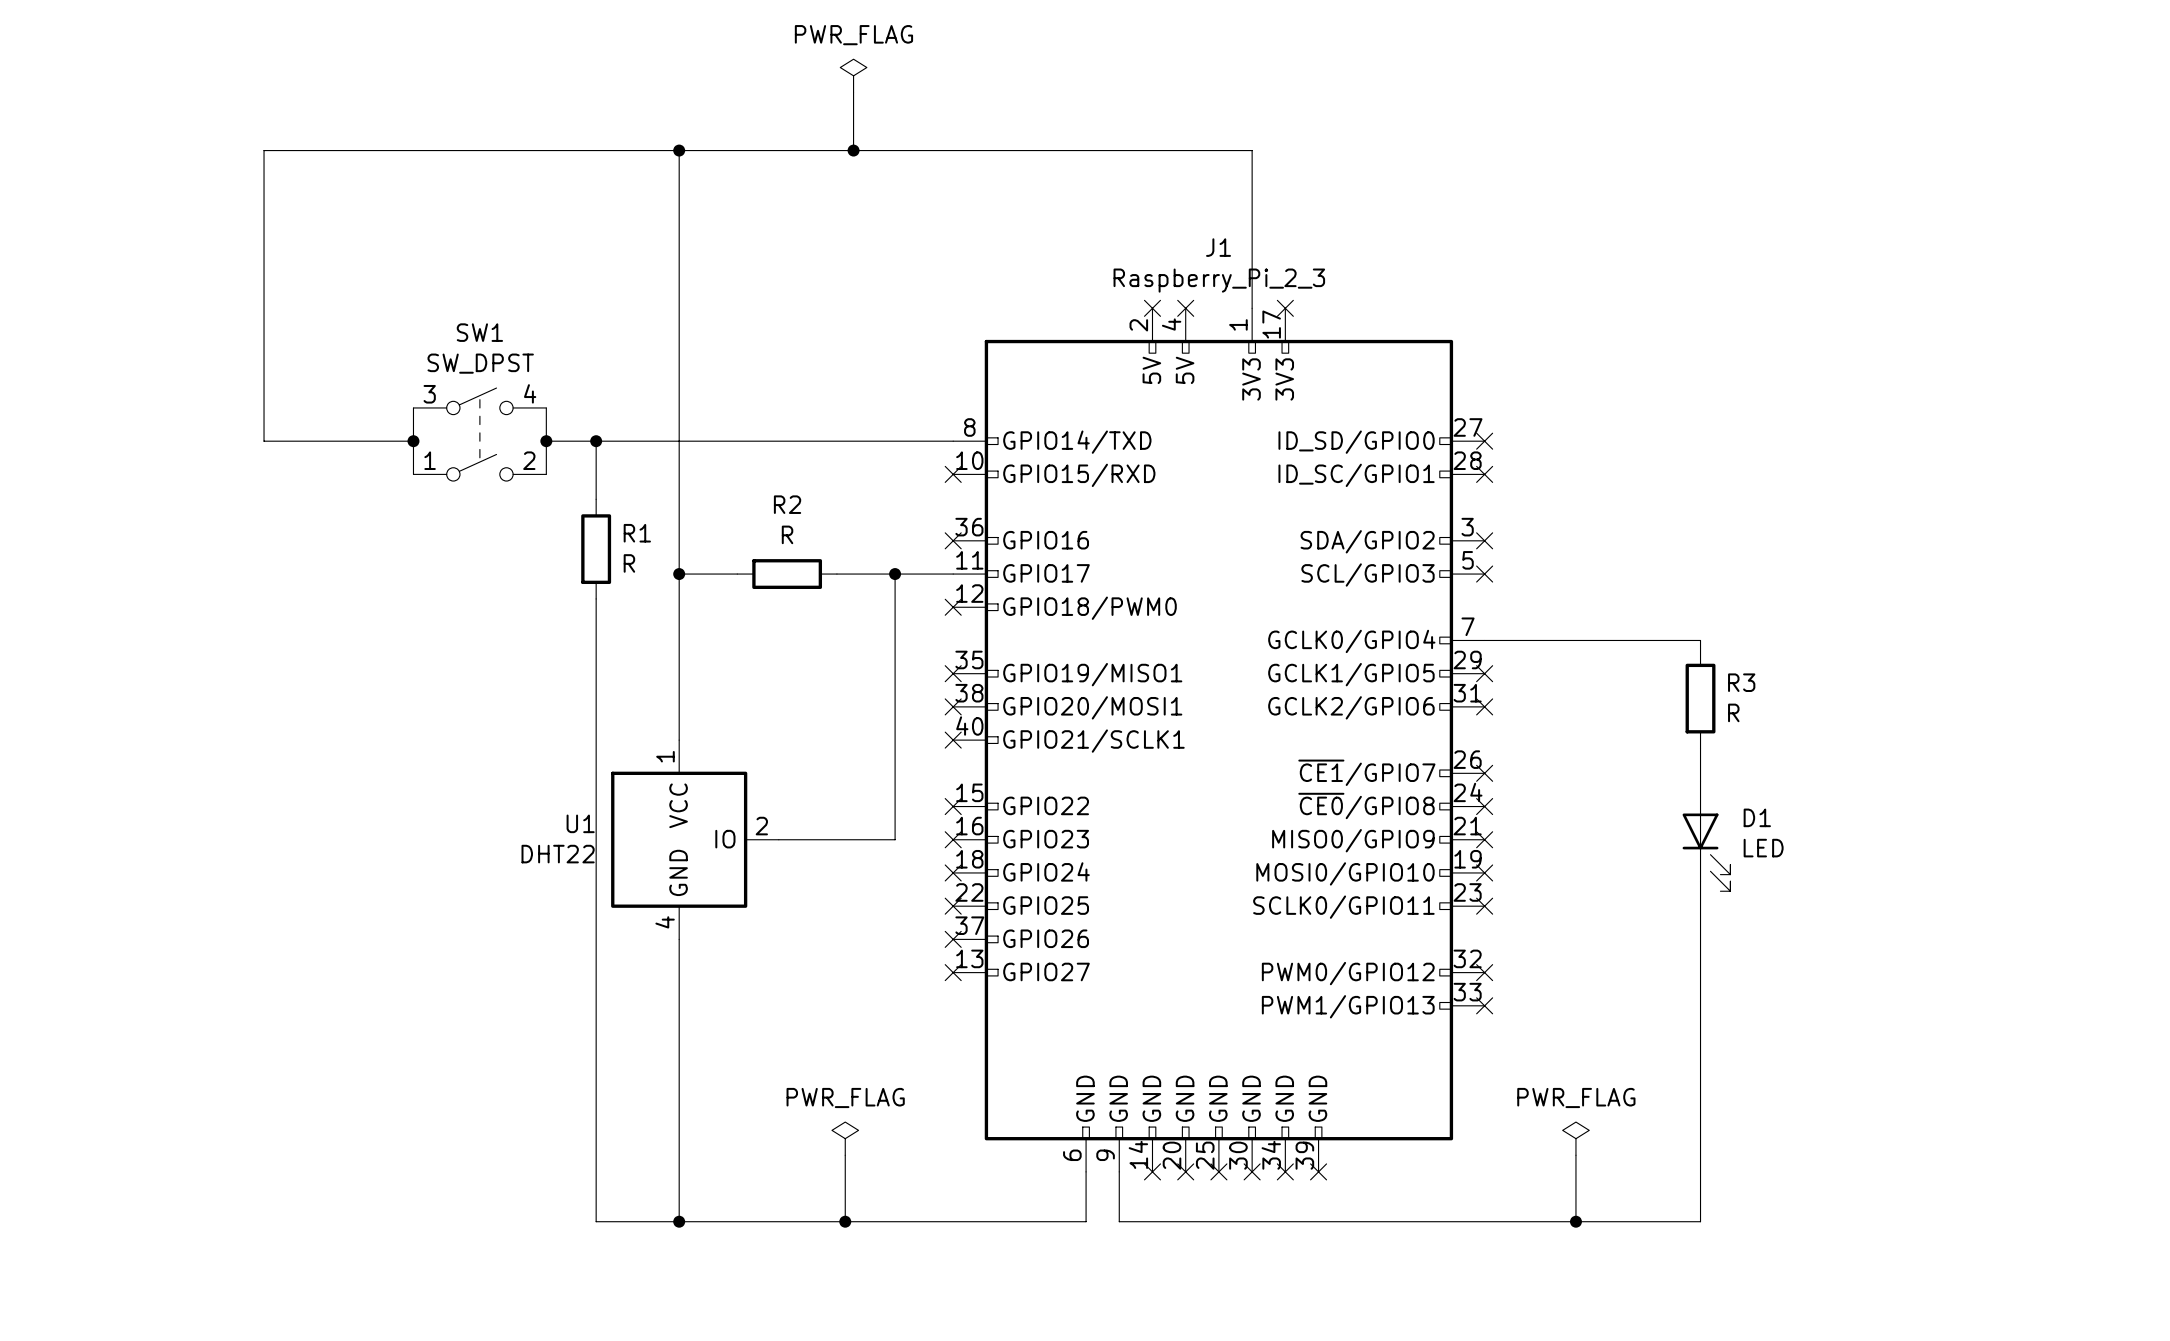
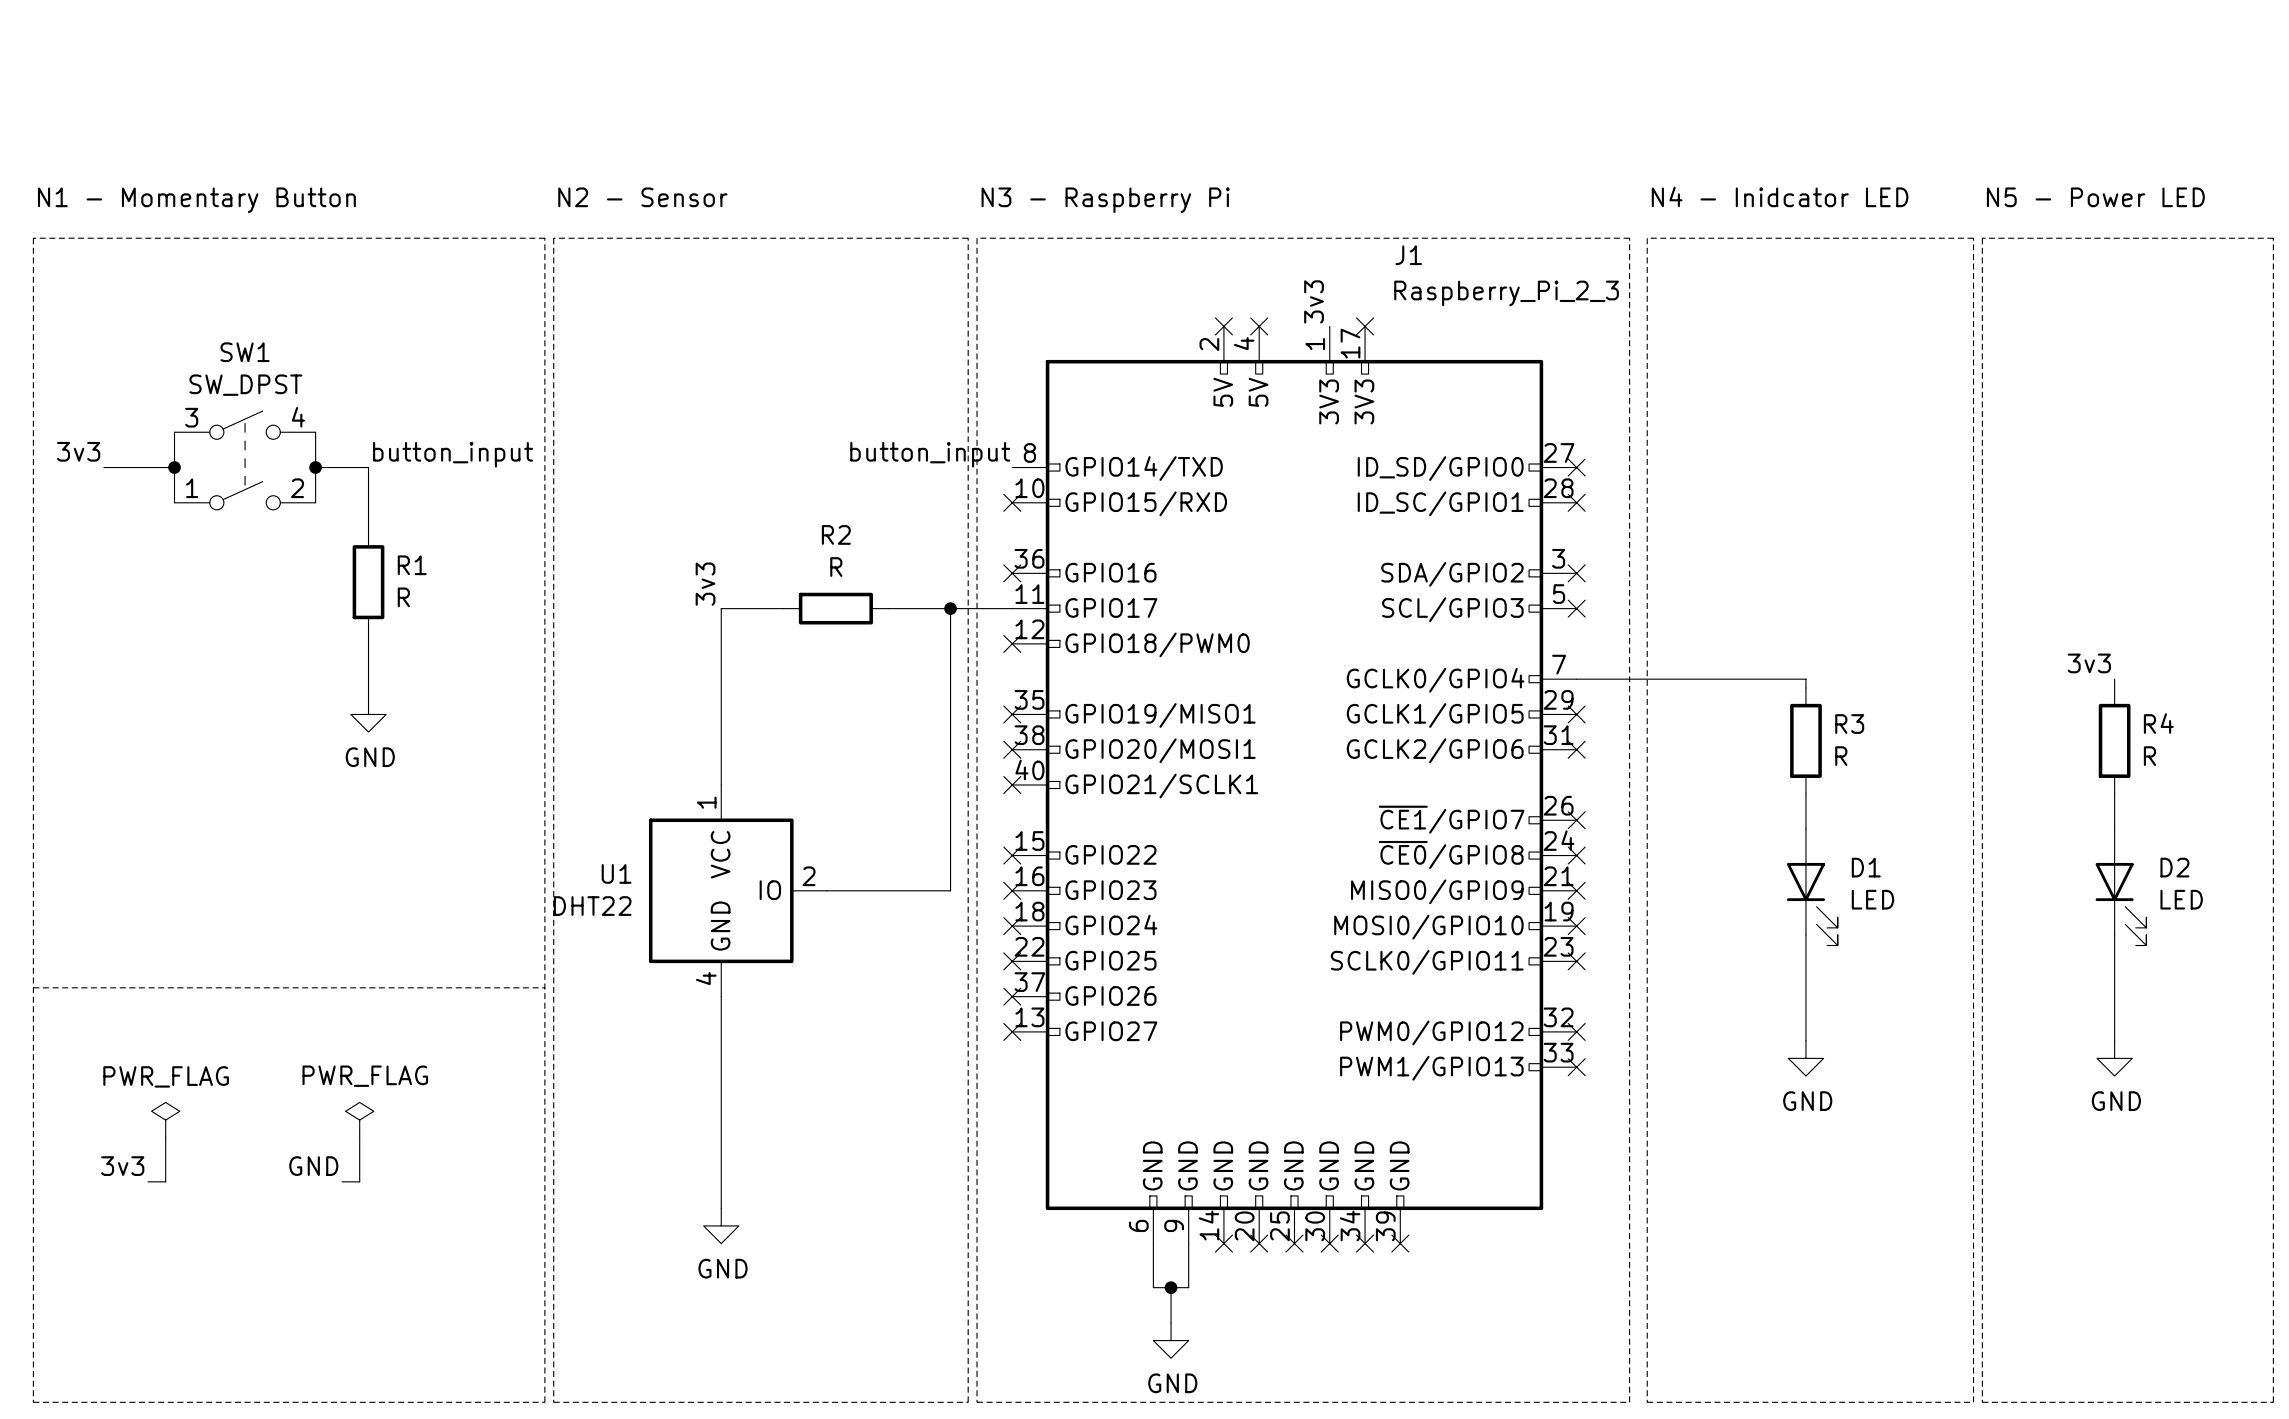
power symbol: PWR_FLAG (853, 75) -> none
wire: (853, 92) (853, 150) -> none
wire: (679, 150) (679, 574) -> none
junction: (679, 150) -> none
junction: (853, 150) -> none
text: none -> N2 - Sensor (642, 197)
text: none -> N4 - Inidcator LED (1780, 196)
text: none -> N5 - Power LED (2095, 197)
text: none -> N1 - Momentary Button (196, 200)
text: none -> N3 - Raspberry Pi (1105, 200)
line: none -> (33, 238) (33, 1402) (544, 1402) (544, 238) (33, 238)
line: none -> (553, 238) (968, 238) (968, 1402) (553, 1402) (553, 238)
line: none -> (977, 238) (1629, 238) (1629, 1402) (977, 1402) (977, 238)
line: none -> (1647, 238) (1973, 238) (1973, 1402) (1647, 1402) (1647, 238)
line: none -> (1982, 238) (2273, 238) (2273, 1402) (1982, 1402) (1982, 238)
J1 name position: J1 (1218, 247) -> J1 (1408, 255)
J1 value position: Raspberry_Pi_2_3 (1219, 280) -> Raspberry_Pi_2_3 (1506, 293)
label: none -> 3v3 (1314, 301)
wire: (1252, 308) (1252, 150) (264, 150) (264, 441) (297, 441) -> none
wire: (413, 407) (413, 474) -> (174, 432) (174, 502)
wire: (546, 407) (546, 474) -> (315, 432) (315, 502)
label: none -> 3v3 (78, 451)
label: none -> button_input (453, 454)
label: none -> button_input (930, 454)
SW1 position: (479, 434) -> (245, 460)
wire: none -> (103, 467) (174, 467)
junction: none -> (174, 467)
junction: none -> (315, 467)
wire: (347, 441) (413, 441) -> (368, 467) (368, 529)
junction: (413, 441) -> none
wire: (546, 441) (953, 441) -> none
junction: (546, 441) -> none
wire: (596, 441) (596, 499) -> (368, 635) (368, 696)
junction: (596, 441) -> none
R1 position: (596, 549) -> (368, 582)
label: none -> 3v3 (705, 584)
junction: (679, 574) -> none
wire: (596, 598) (596, 1221) (1086, 1221) (1086, 1213) -> none
label: none -> 3v3 (2089, 663)
wire: none -> (2114, 679) (2114, 687)
power symbol: none -> GND (368, 714)
R4: none -> R (2114, 740)
wire: none -> (2114, 793) (2114, 829)
D2: none -> LED (2120, 887)
wire: none -> (2114, 934) (2114, 1040)
line: none -> (33, 987) (544, 987)
wire: (1700, 980) (1700, 1221) (1119, 1221) (1119, 1213) -> (1153, 1287) (1188, 1287)
power symbol: none -> GND (1805, 1058)
power symbol: none -> GND (2114, 1058)
power symbol: none -> PWR_FLAG (165, 1120)
power symbol: none -> PWR_FLAG (359, 1120)
wire: none -> (165, 1137) (165, 1181) (148, 1181)
wire: none -> (359, 1137) (359, 1181) (342, 1181)
label: none -> 3v3 (122, 1166)
label: none -> GND (313, 1166)
wire: (679, 1138) (679, 1221) -> none
power symbol: PWR_FLAG (845, 1138) -> none
power symbol: PWR_FLAG (1575, 1138) -> none
power symbol: none -> GND (721, 1225)
wire: (845, 1155) (845, 1221) -> none
wire: (1575, 1155) (1575, 1221) -> none
wire: none -> (1171, 1287) (1171, 1322)
junction: none -> (1171, 1287)
junction: (679, 1221) -> none
junction: (845, 1221) -> none
junction: (1575, 1221) -> none
power symbol: none -> GND (1171, 1340)

